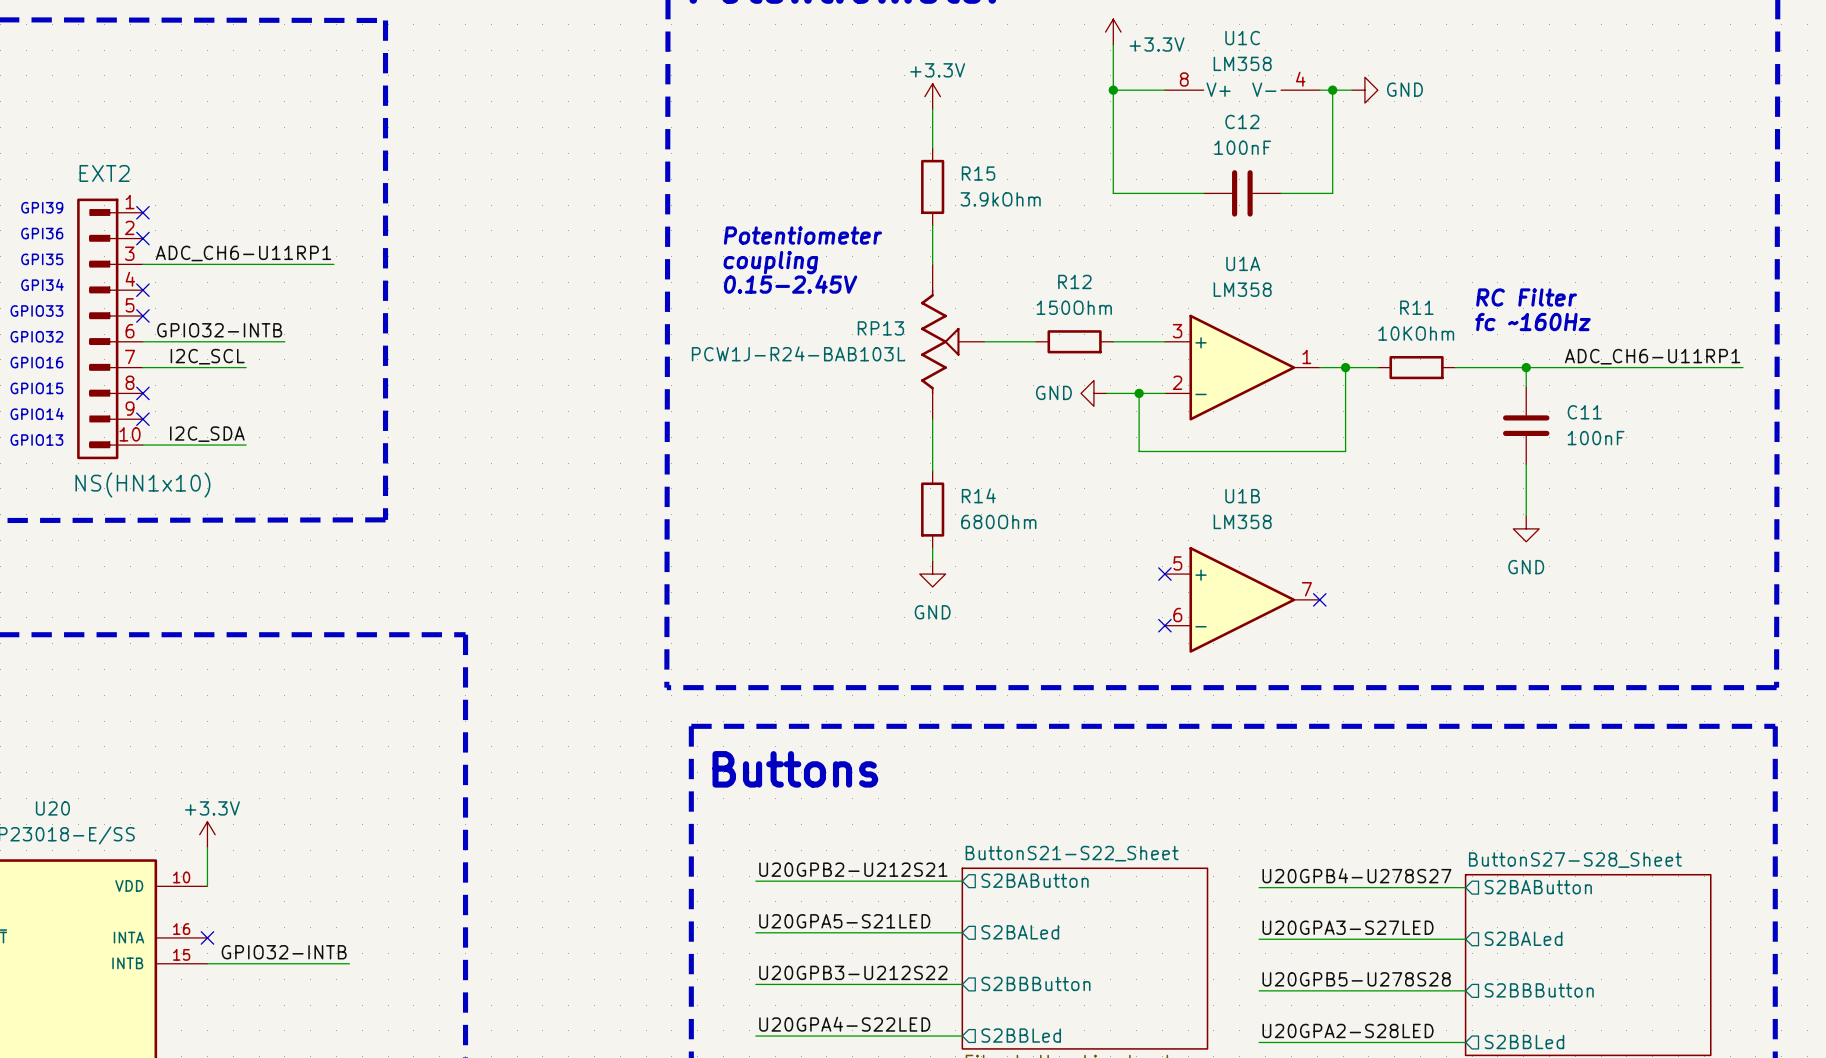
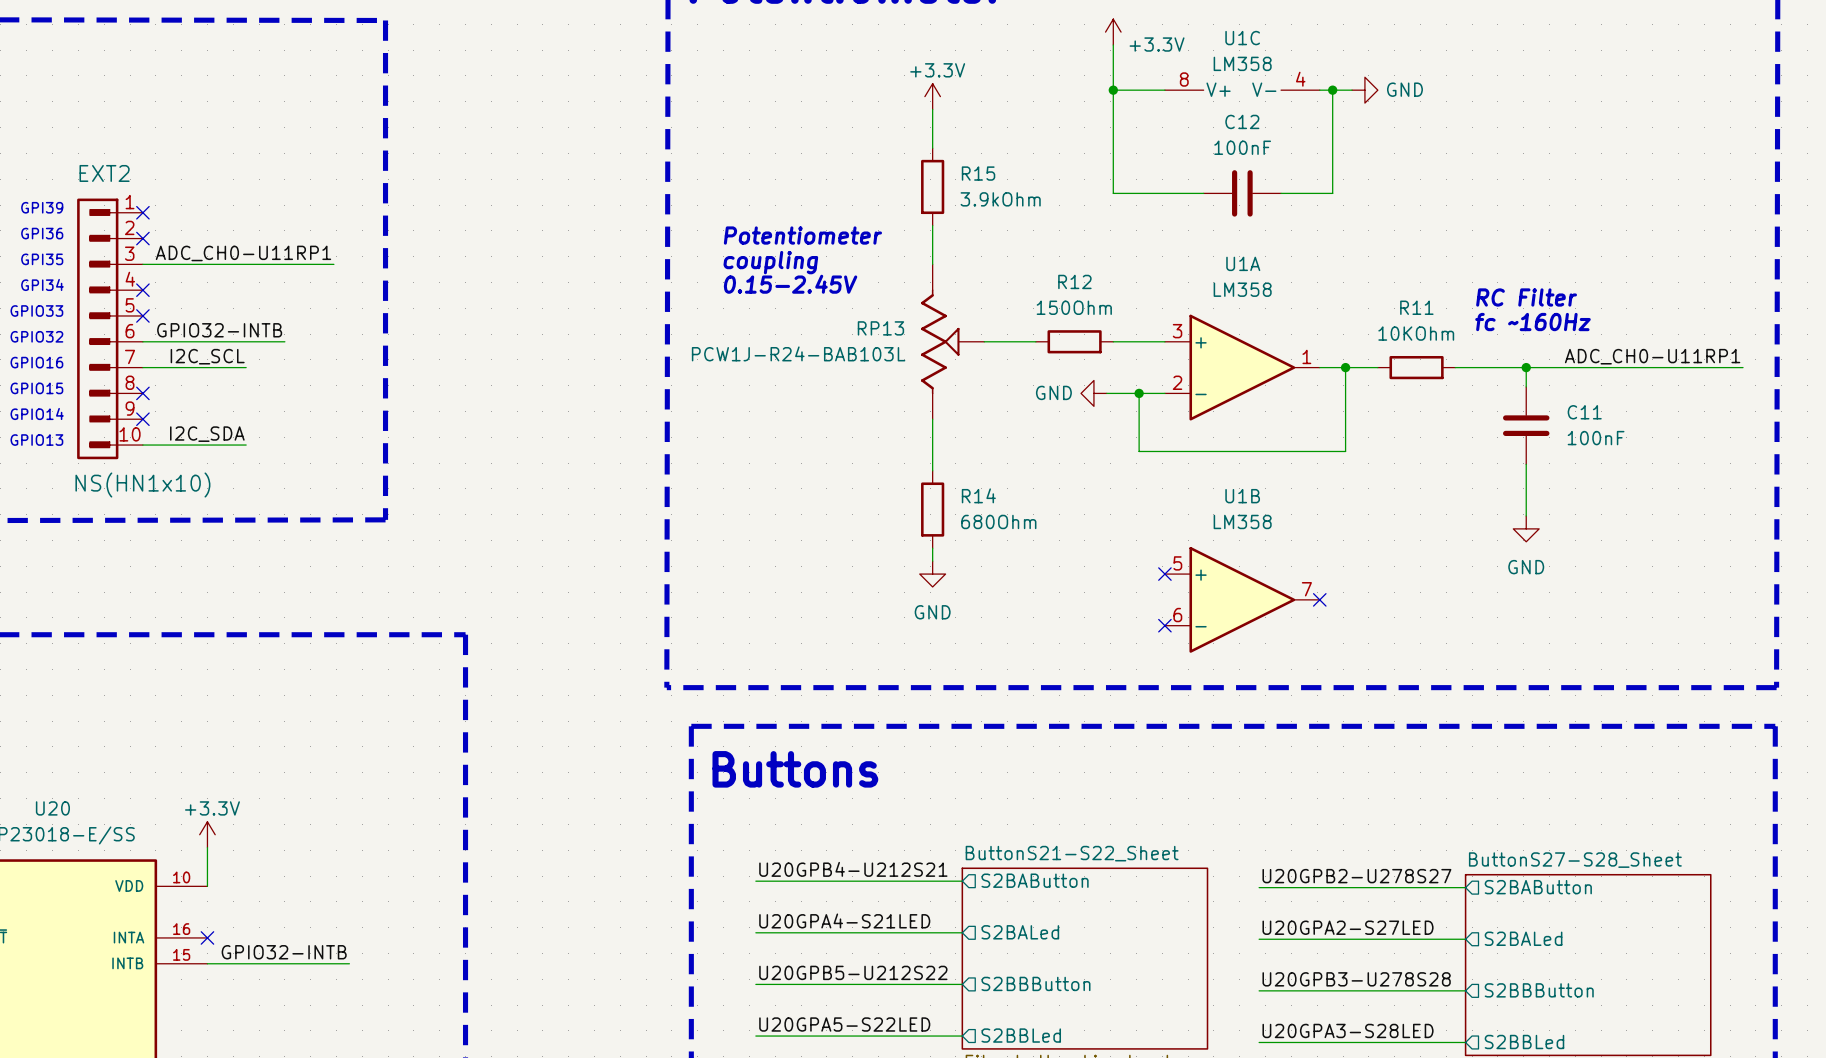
label: ADC_CH6-U11RP1 (243, 253) -> ADC_CH0-U11RP1 (243, 253)
label: ADC_CH6-U11RP1 (1652, 356) -> ADC_CH0-U11RP1 (1652, 356)
label: U20GPB2-U212S21 (853, 869) -> U20GPB4-U212S21 (853, 869)
label: U20GPB4-U278S27 (1356, 875) -> U20GPB2-U278S27 (1356, 876)
label: U20GPA5-S21LED (844, 921) -> U20GPA4-S21LED (844, 920)
label: U20GPA3-S27LED (1348, 927) -> U20GPA2-S27LED (1348, 927)
label: U20GPB3-U212S22 (853, 972) -> U20GPB5-U212S22 (853, 972)
label: U20GPB5-U278S28 (1356, 979) -> U20GPB3-U278S28 (1356, 979)
label: U20GPA4-S22LED (844, 1024) -> U20GPA5-S22LED (844, 1024)
label: U20GPA2-S28LED (1348, 1030) -> U20GPA3-S28LED (1348, 1030)

